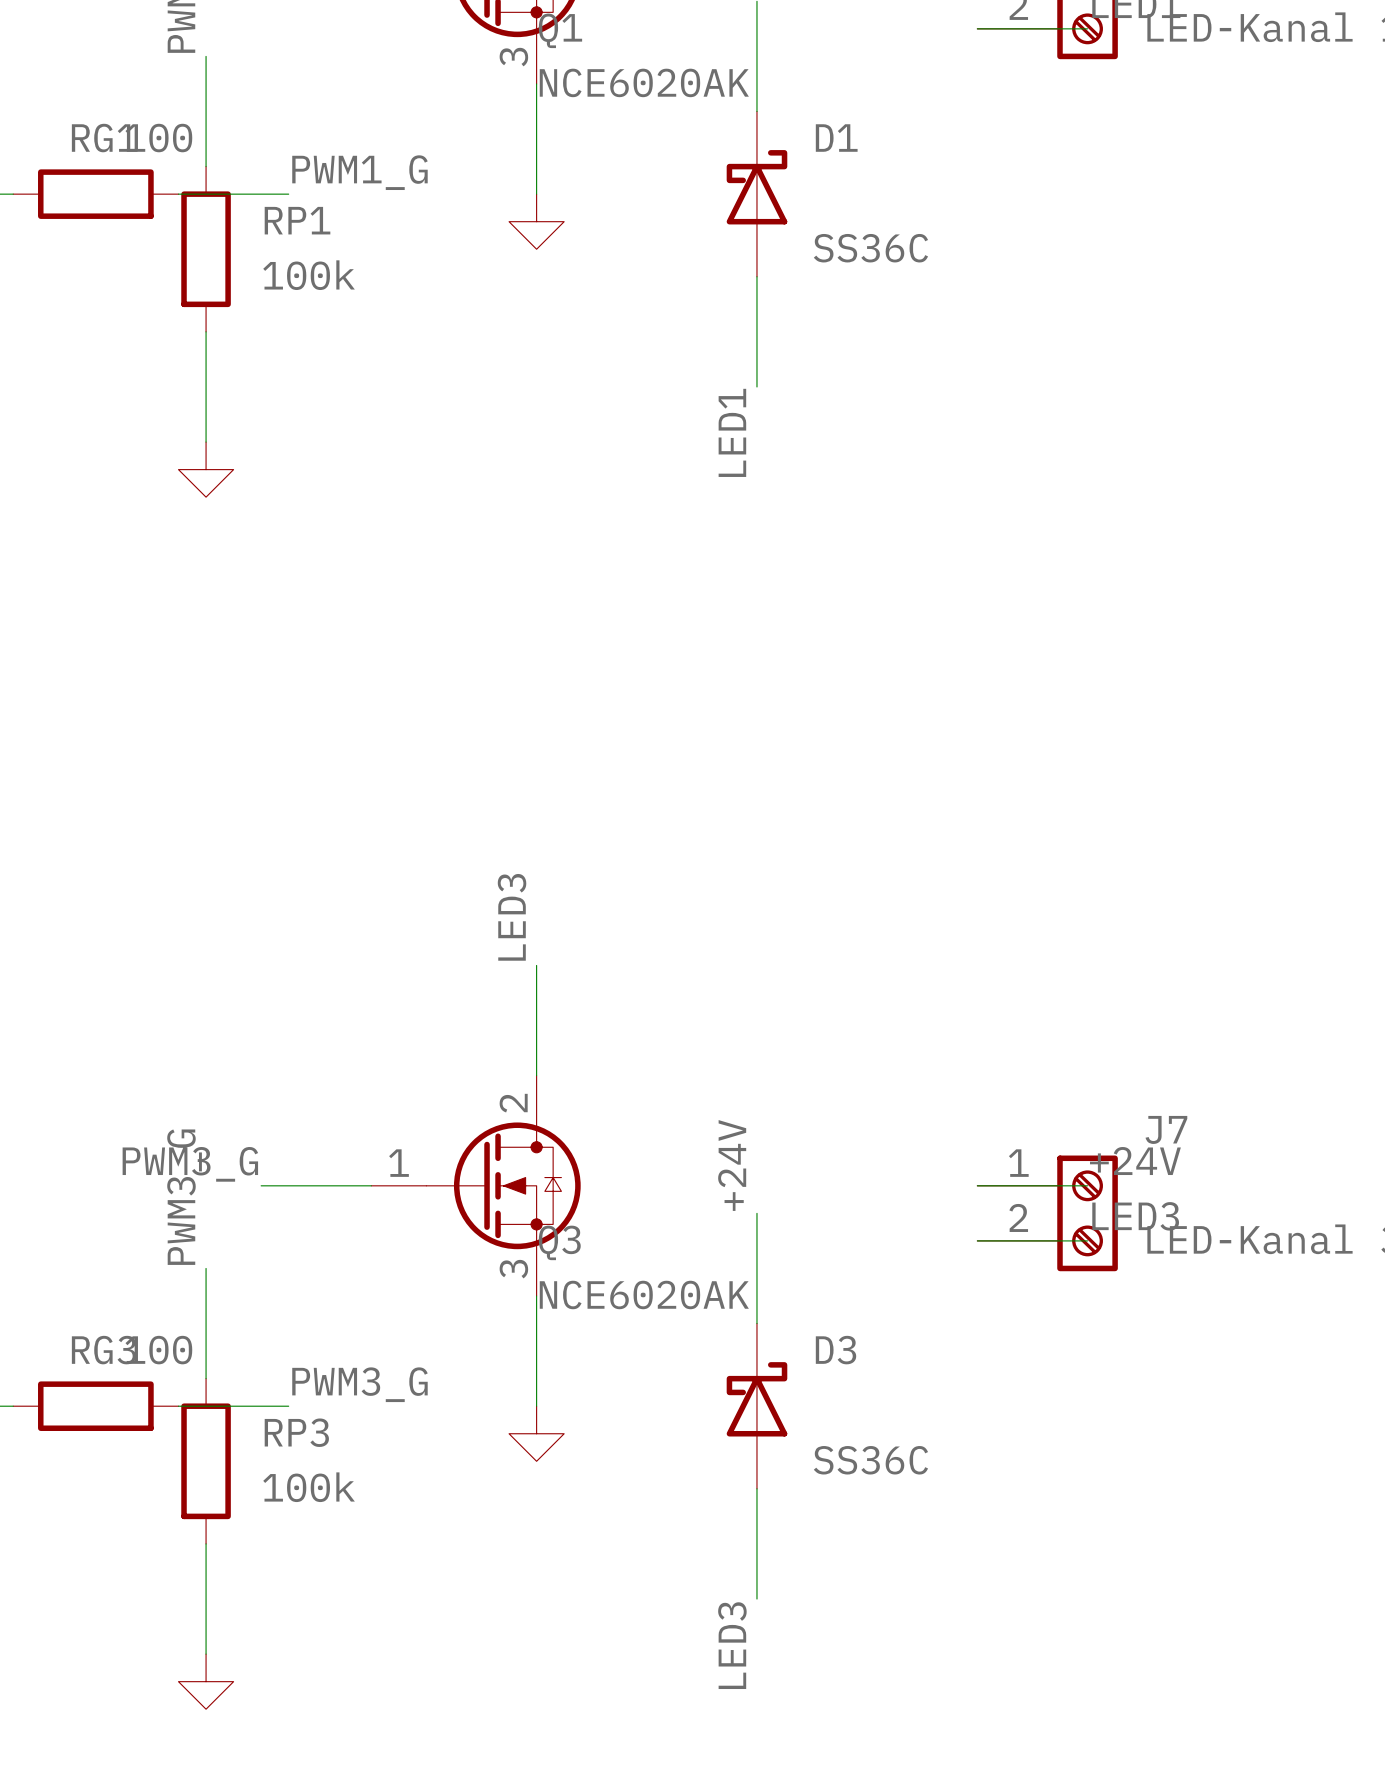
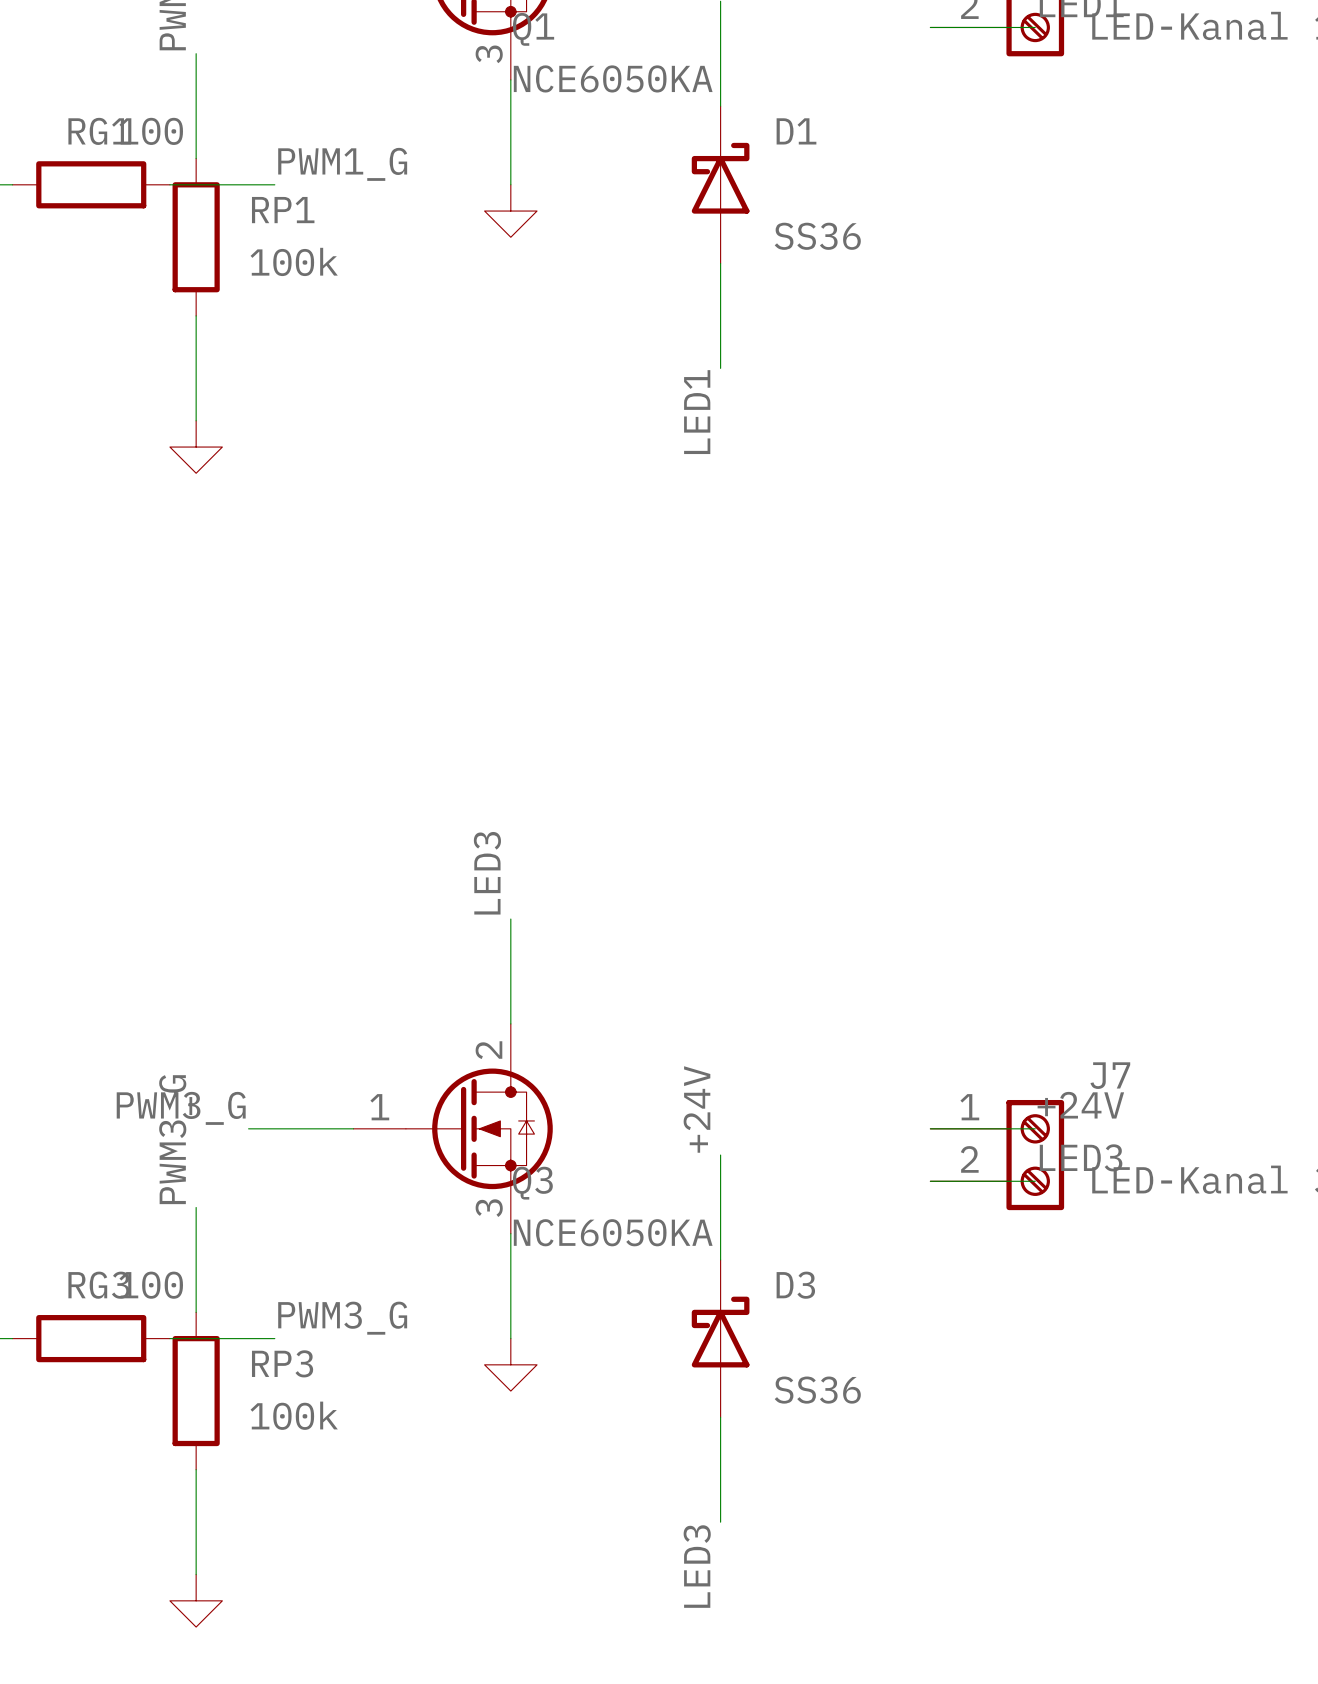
Q1 value: NCE6020AK (644, 82) -> NCE6050KA (613, 78)
D1 value: SS36C (870, 248) -> SS36 (817, 236)
Q3 value: NCE6020AK (644, 1294) -> NCE6050KA (613, 1232)
D3 value: SS36C (870, 1460) -> SS36 (817, 1390)

